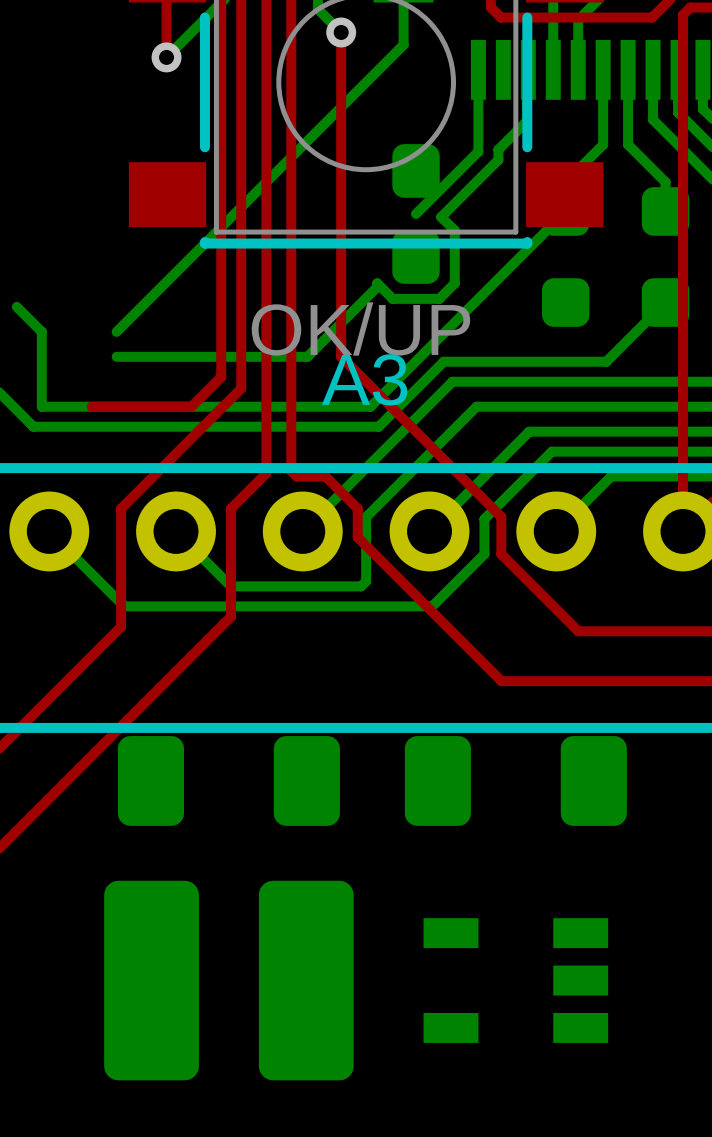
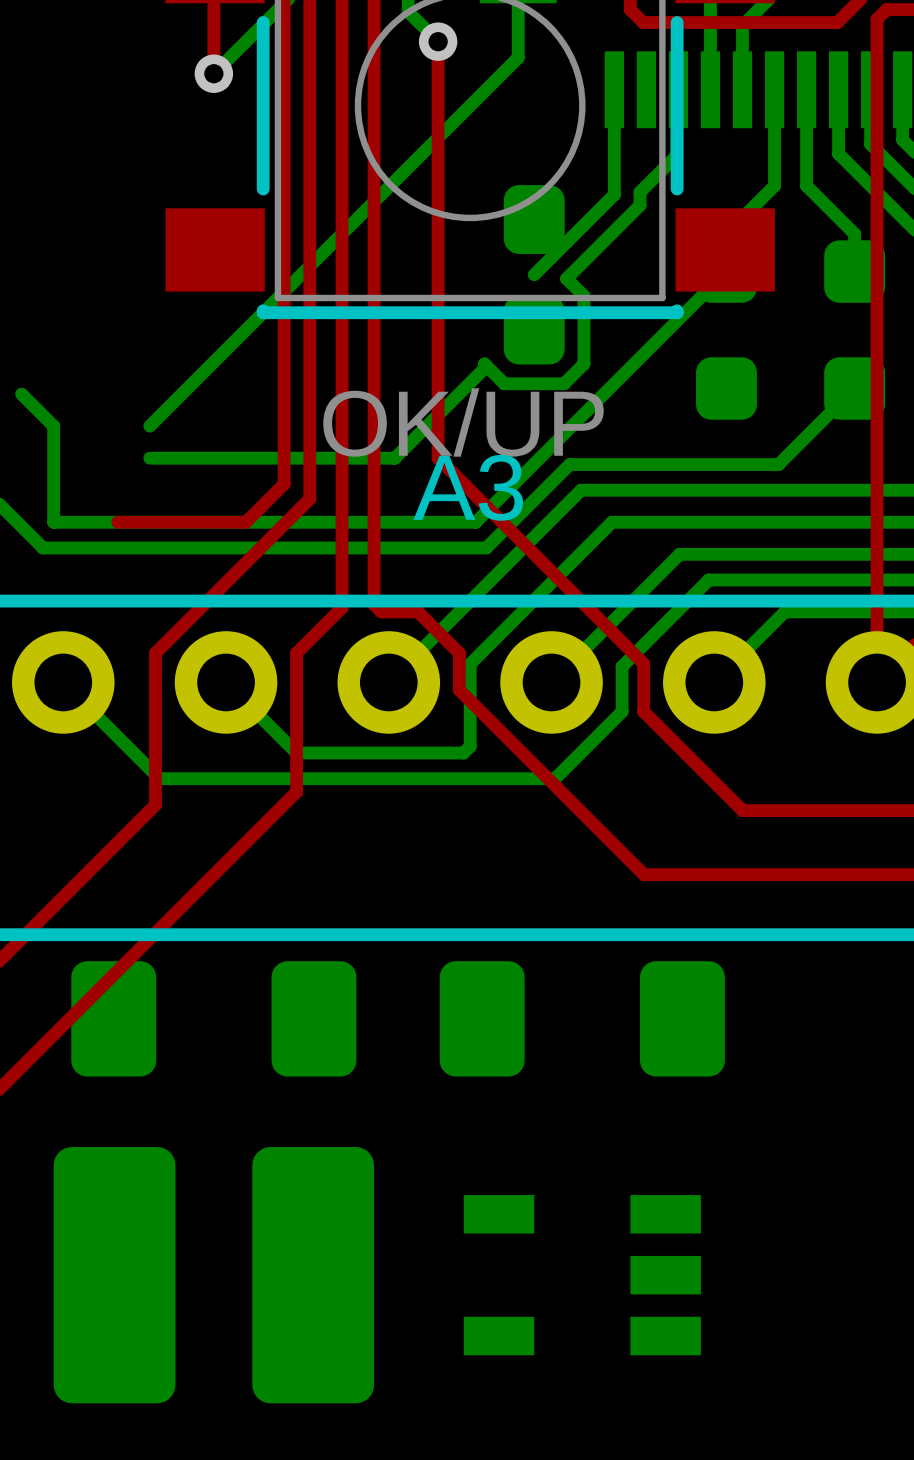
part position: (228, 780) -> (213, 1018)
part position: (515, 780) -> (582, 1018)
part position: (228, 980) -> (213, 1275)
part position: (515, 980) -> (582, 1275)

